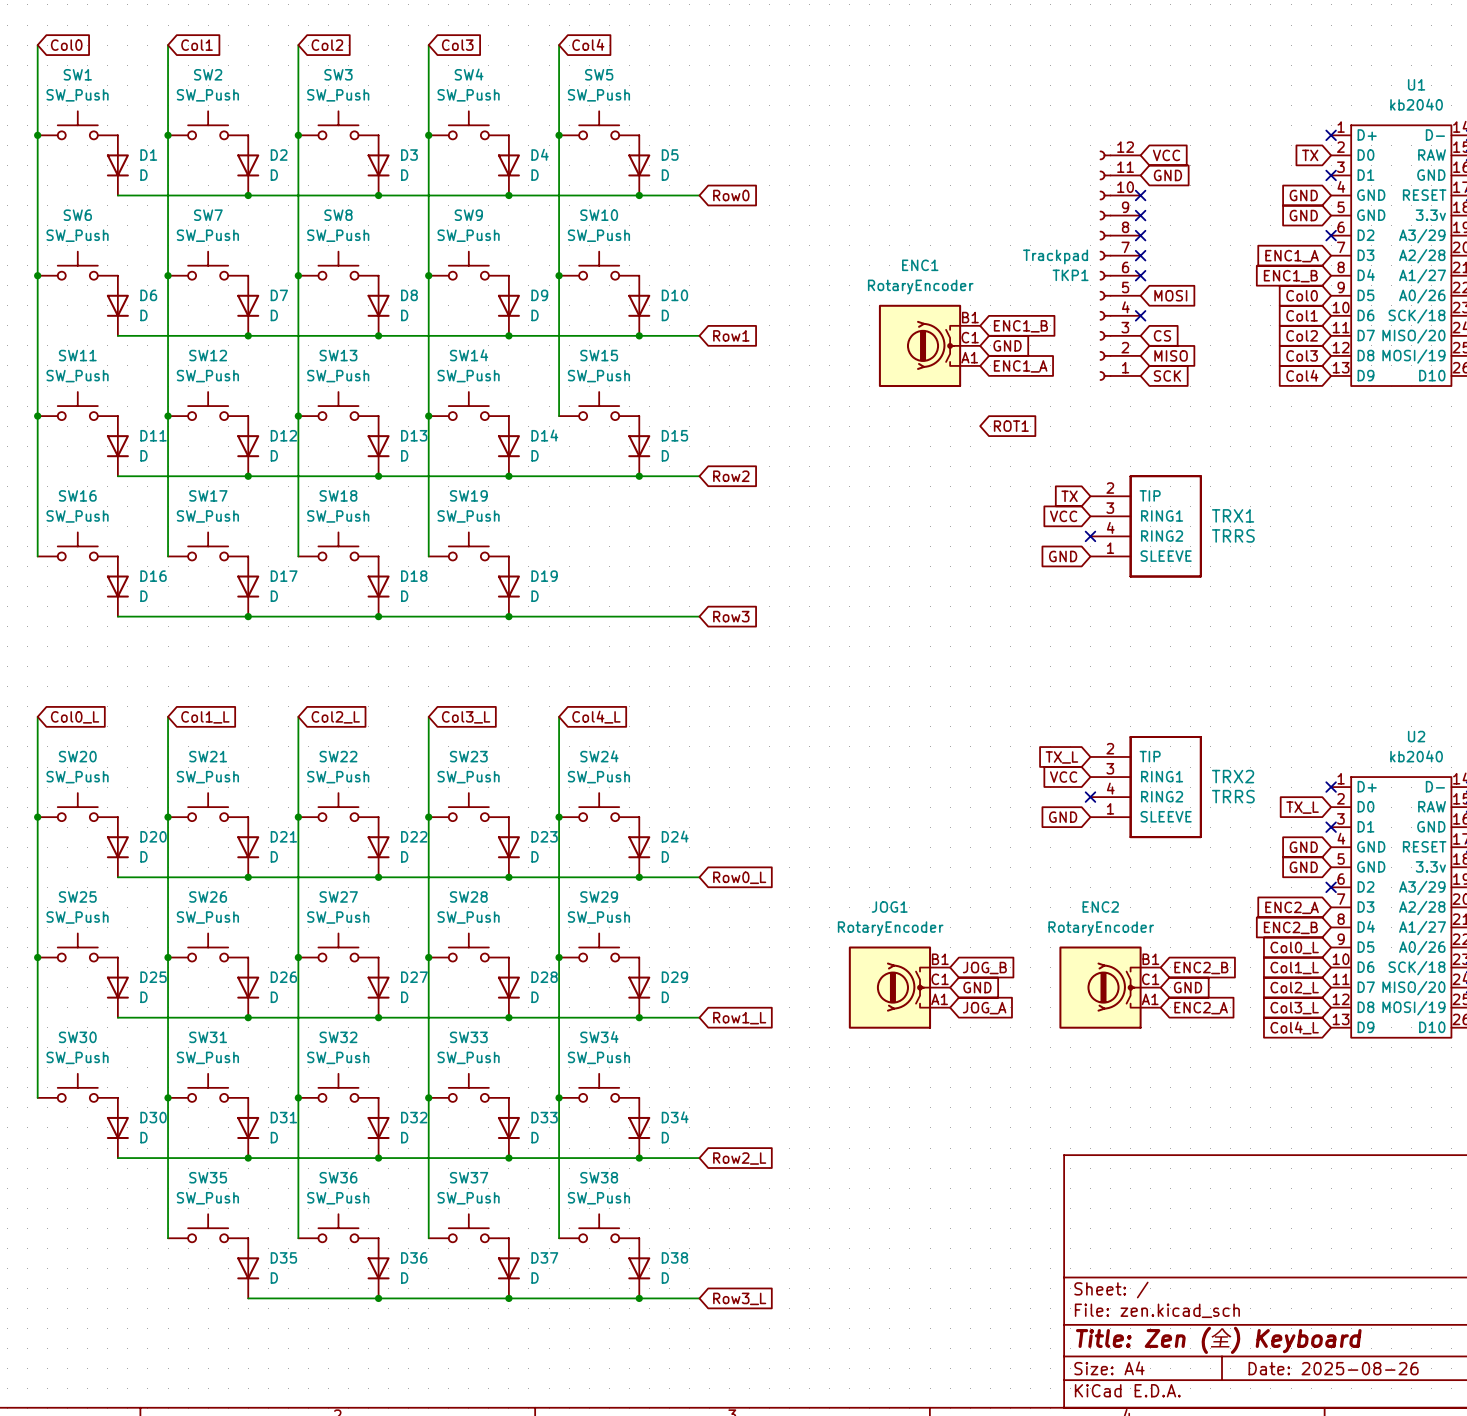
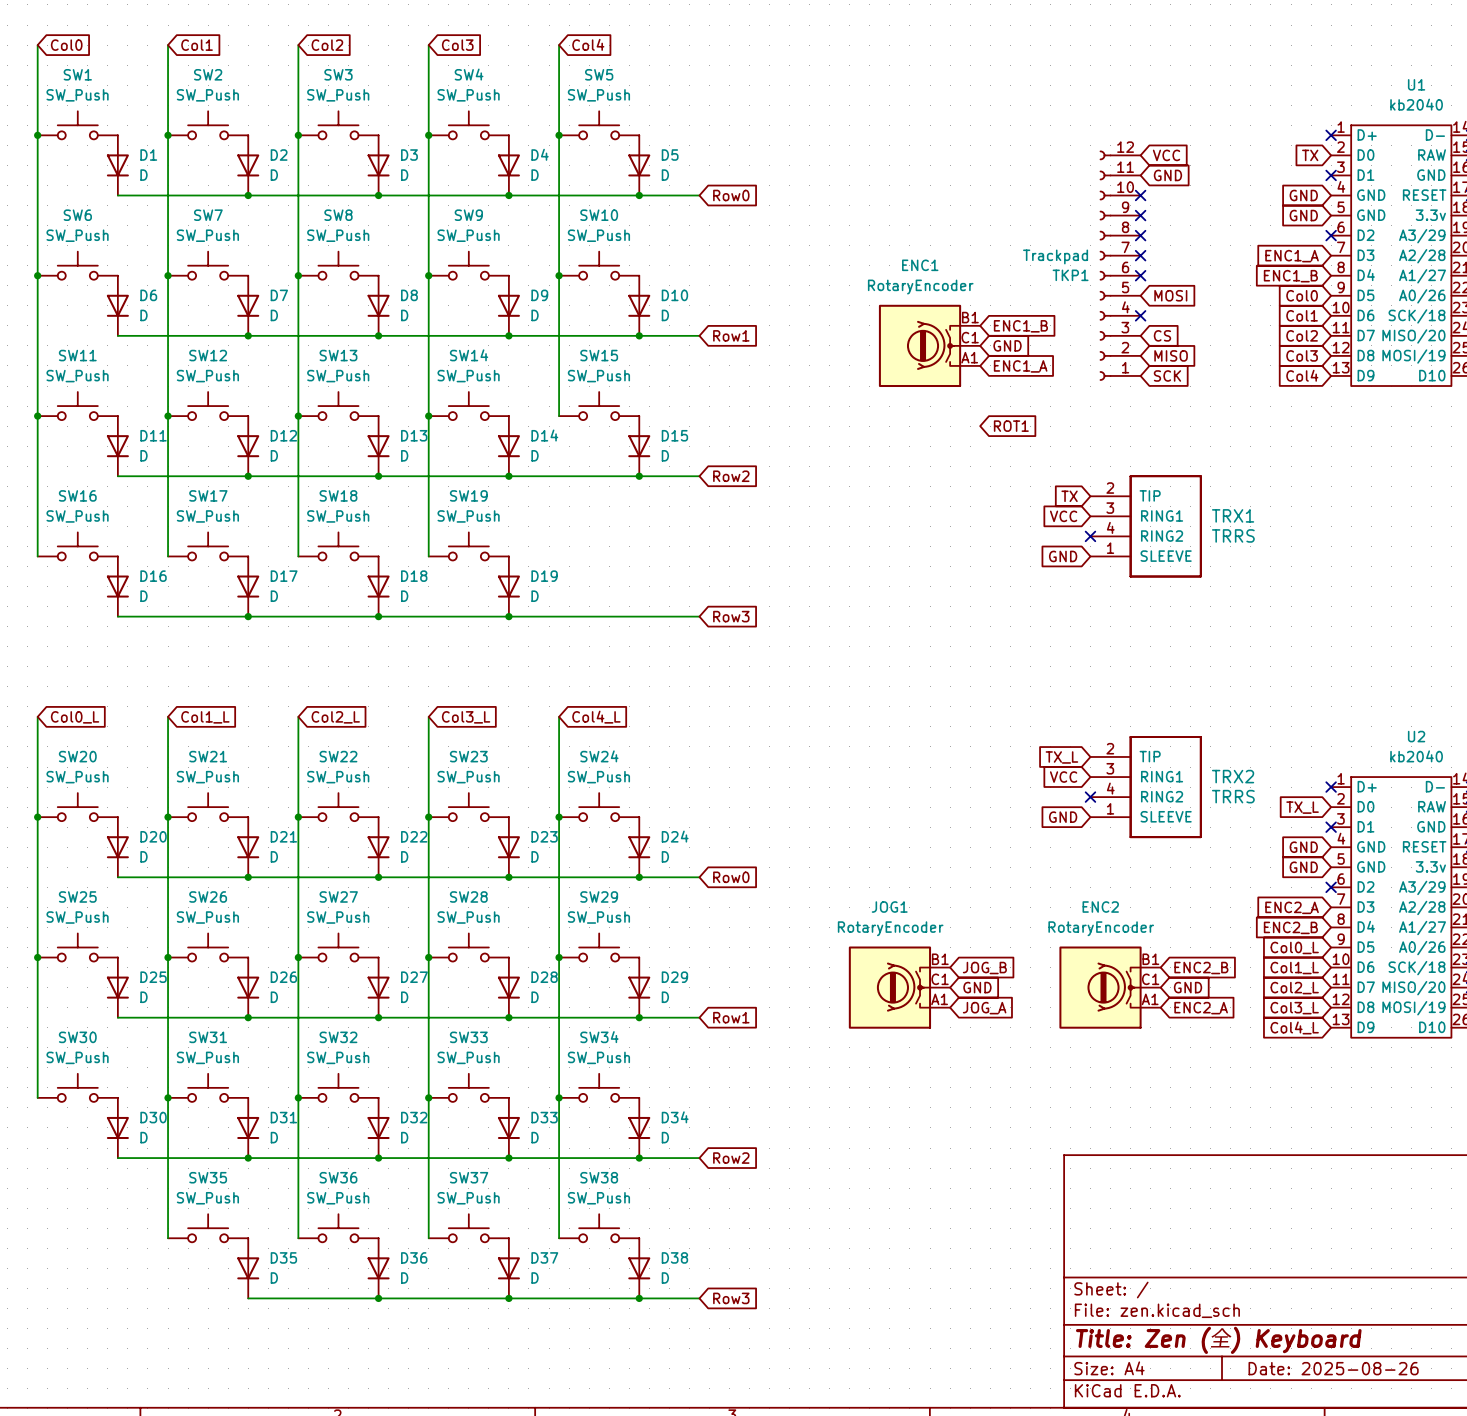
global label: Row0_L (739, 877) -> Row0 (731, 877)
global label: Row1_L (739, 1018) -> Row1 (731, 1017)
global label: Row2_L (739, 1158) -> Row2 (731, 1158)
global label: Row3_L (739, 1298) -> Row3 (731, 1298)

